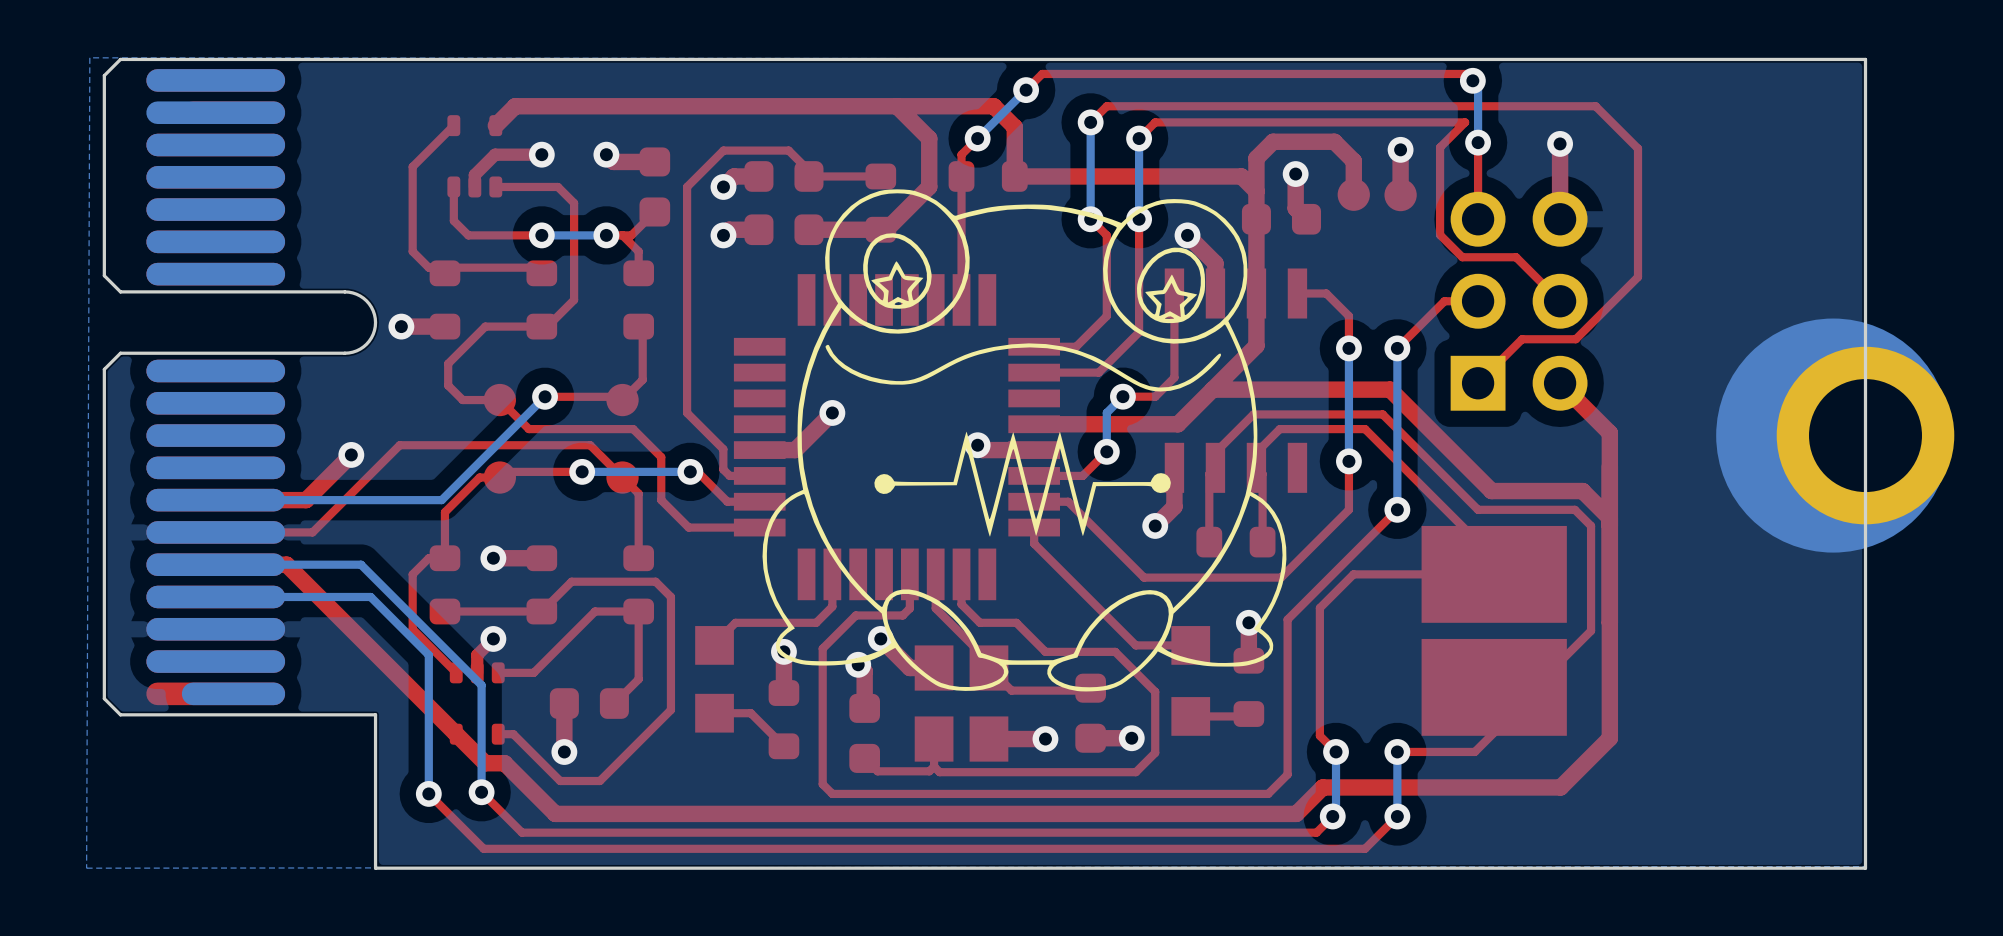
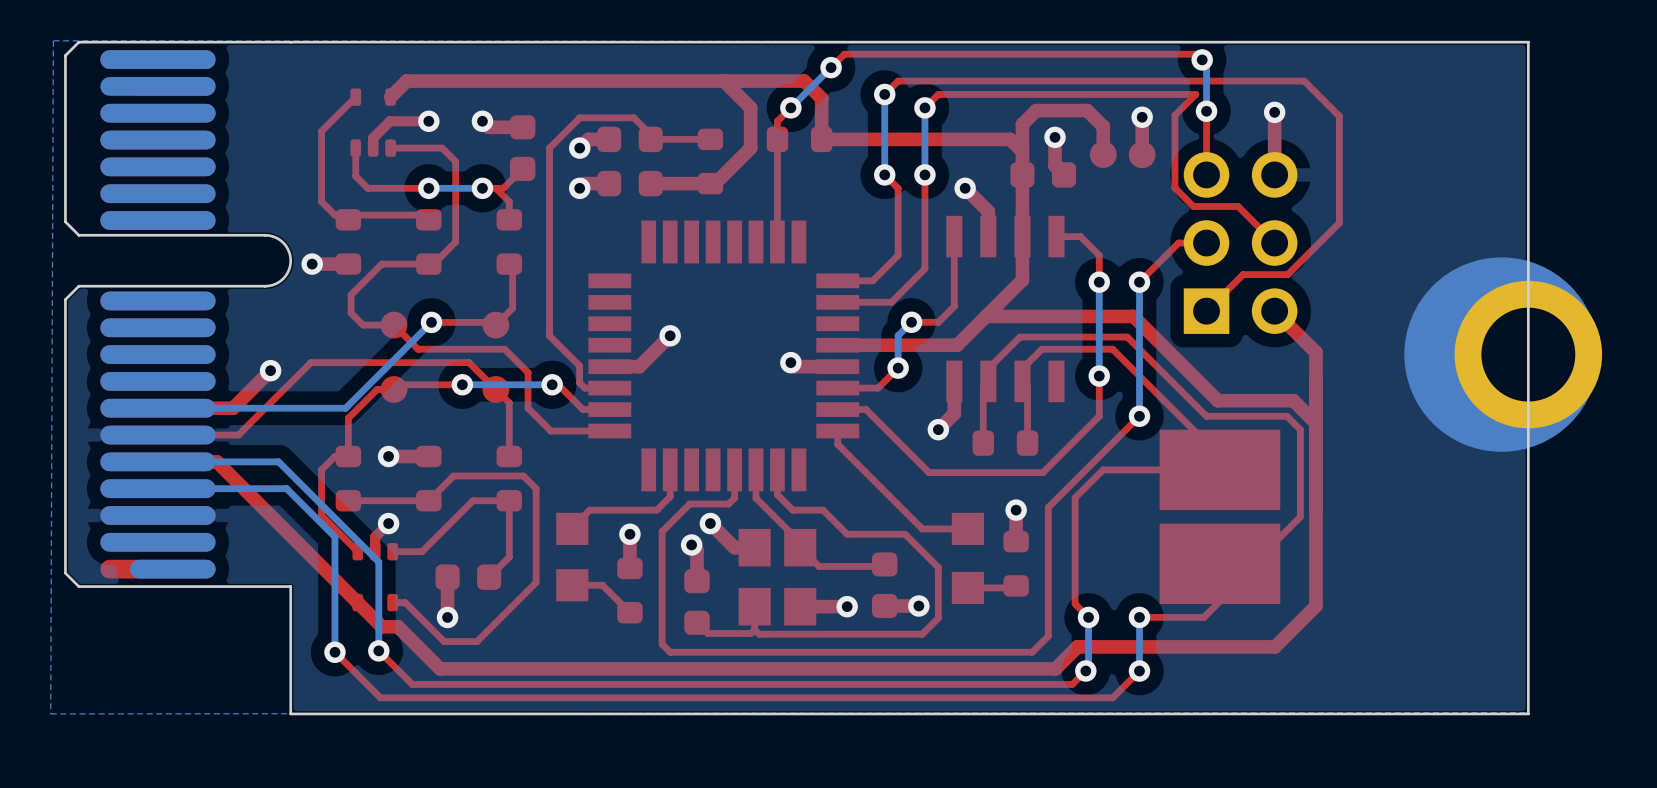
drawing: [762, 189, 1287, 692] -> none

